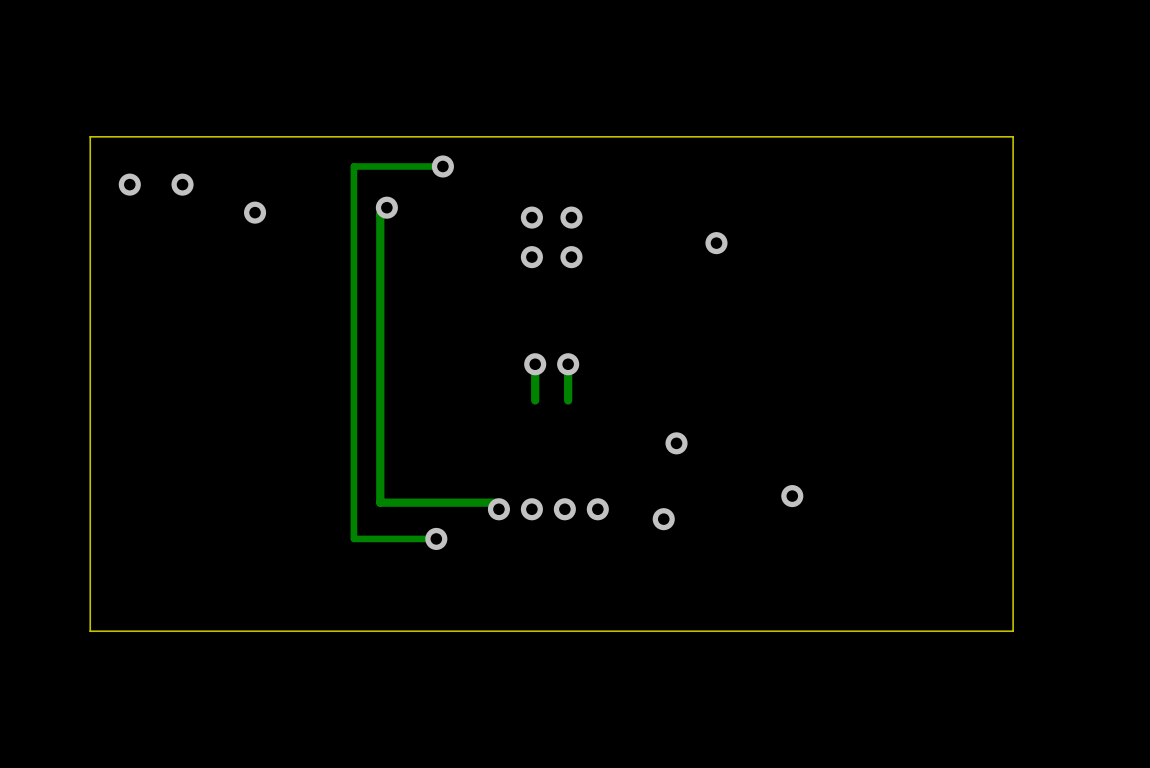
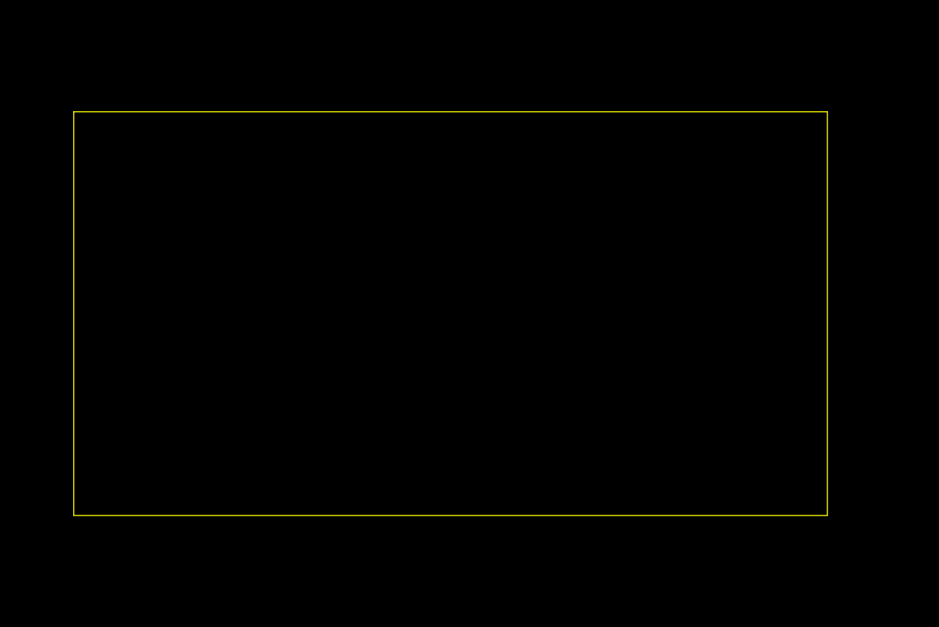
track: (442, 166) (353, 166) (353, 538) (436, 538) -> none
via: (442, 166) -> none
via: (129, 184) -> none
via: (182, 184) -> none
track: (386, 207) (380, 214) (380, 502) (495, 502) -> none
via: (386, 207) -> none
via: (255, 212) -> none
via: (531, 217) -> none
via: (571, 217) -> none
via: (716, 243) -> none
via: (531, 257) -> none
via: (571, 257) -> none
track: (535, 364) (535, 400) -> none
via: (535, 364) -> none
track: (568, 364) (568, 400) -> none
via: (568, 364) -> none
via: (676, 443) -> none
via: (792, 496) -> none
via: (498, 509) -> none
via: (531, 509) -> none
via: (564, 509) -> none
via: (597, 509) -> none
via: (663, 519) -> none
via: (436, 538) -> none

